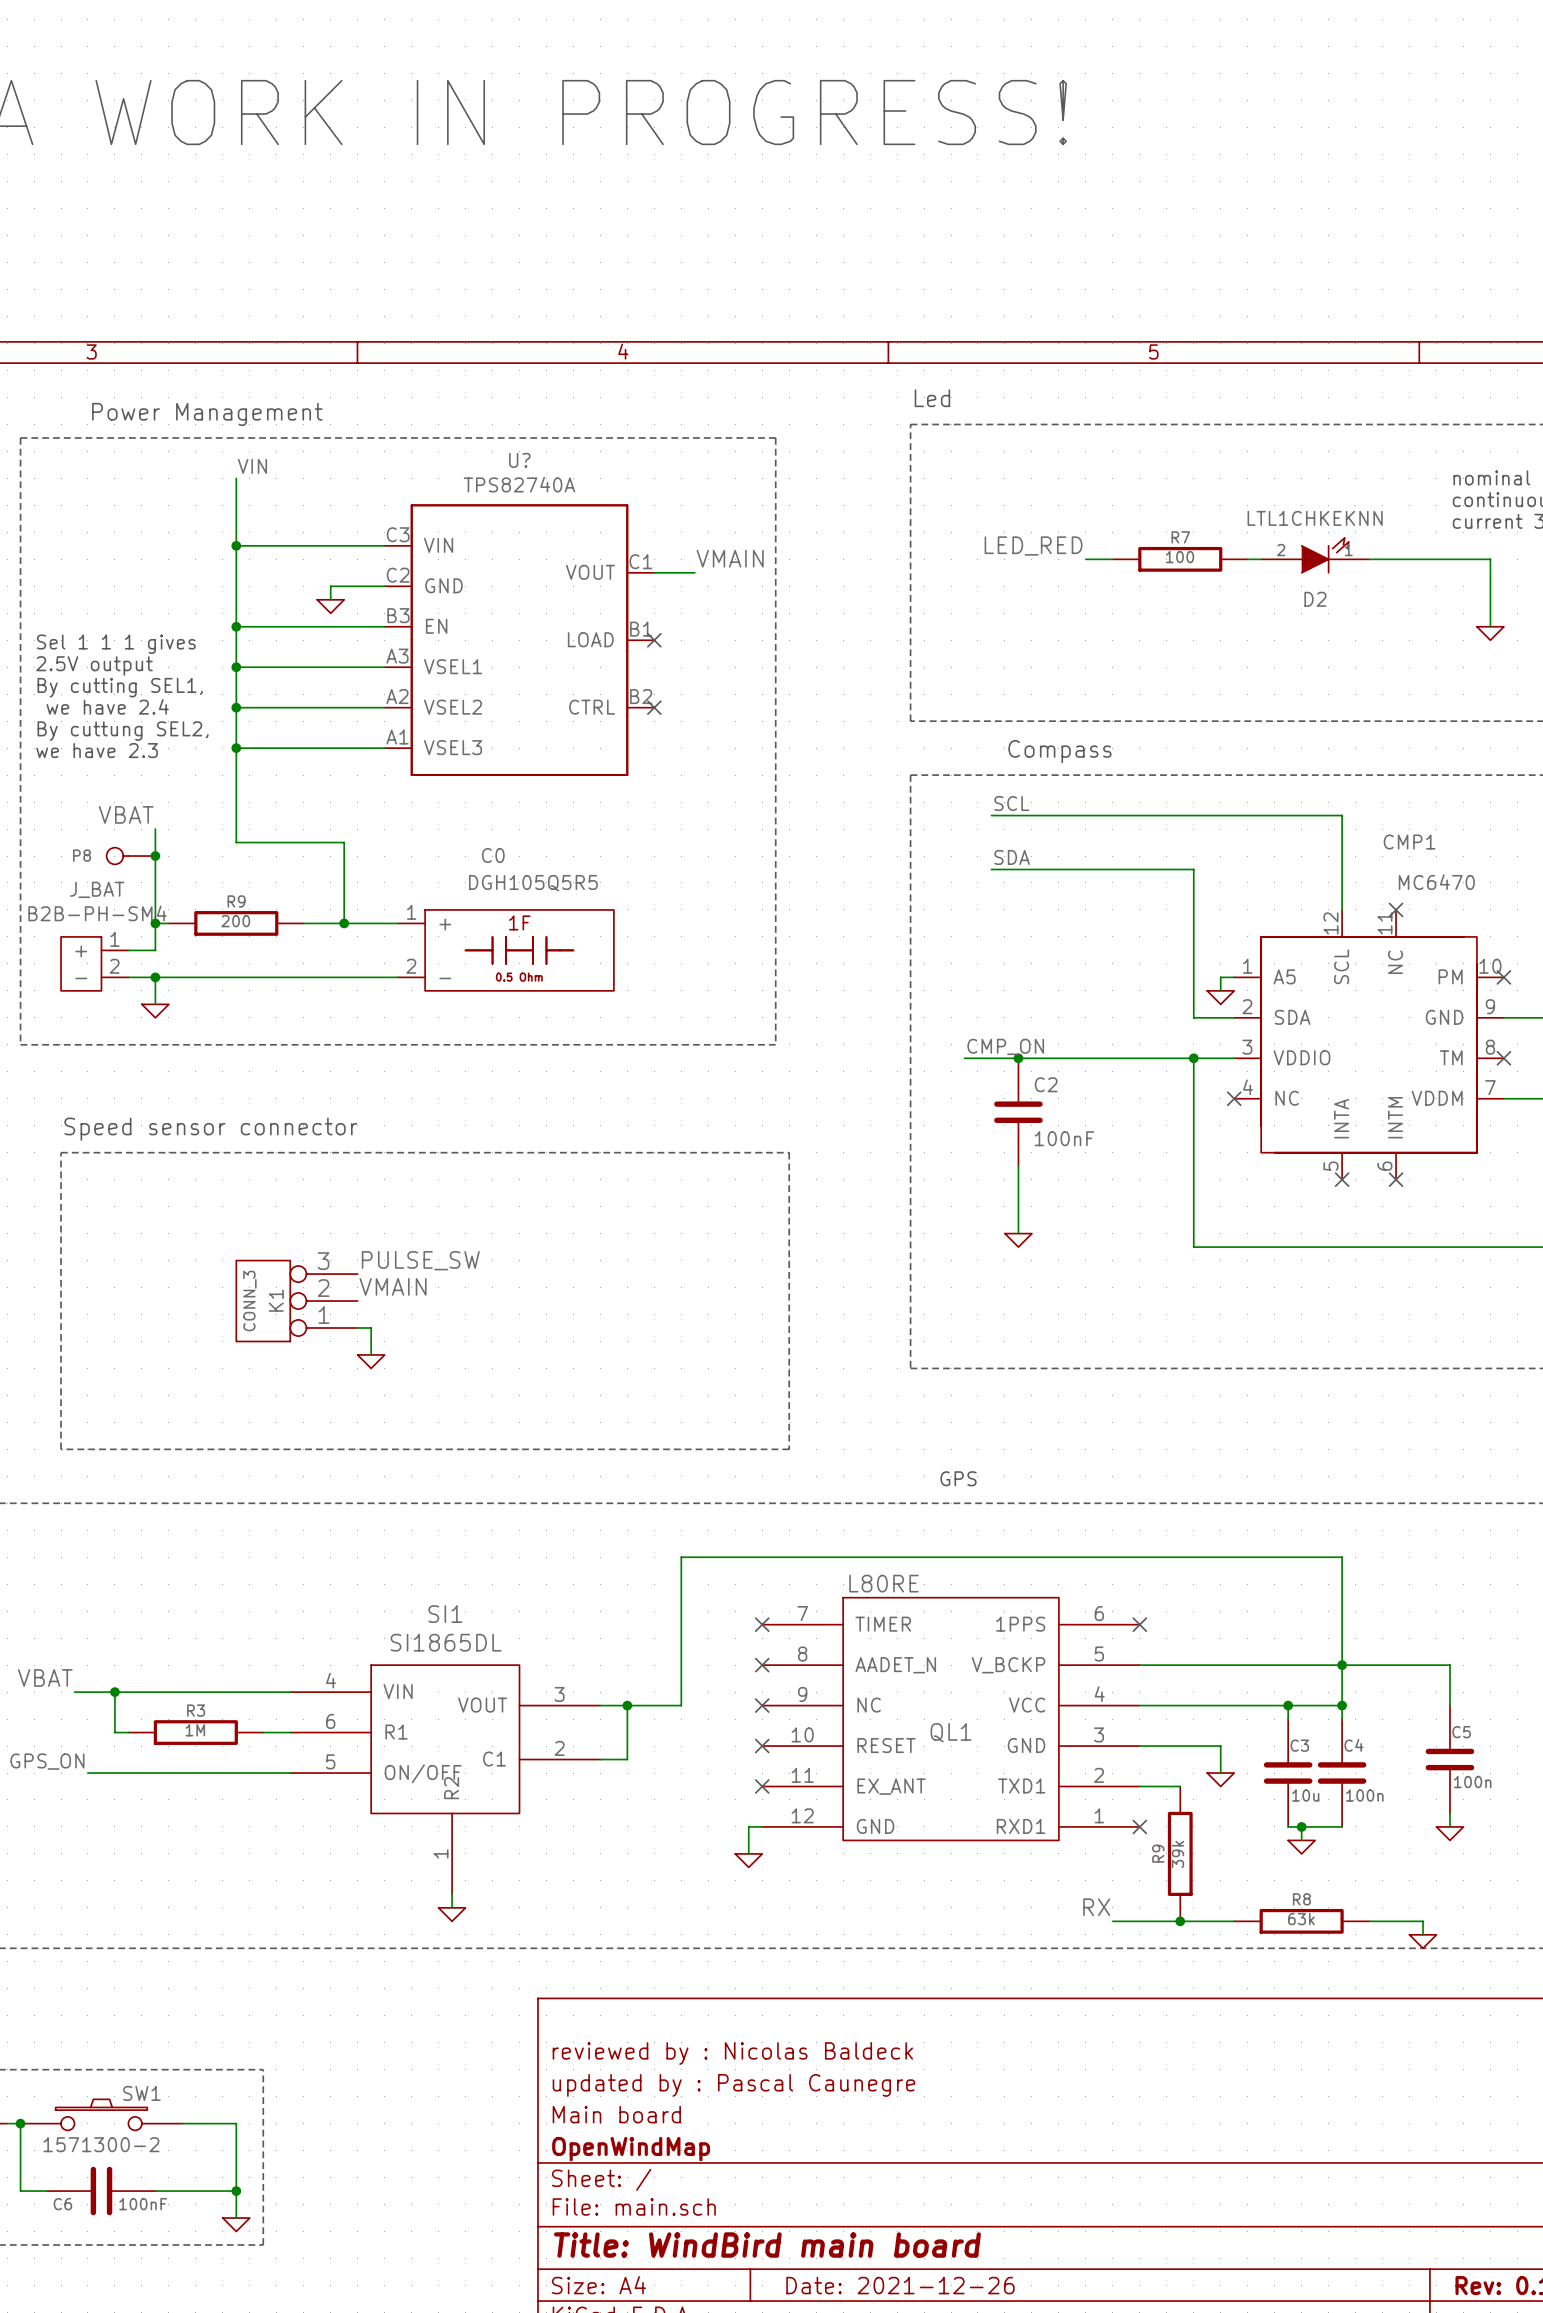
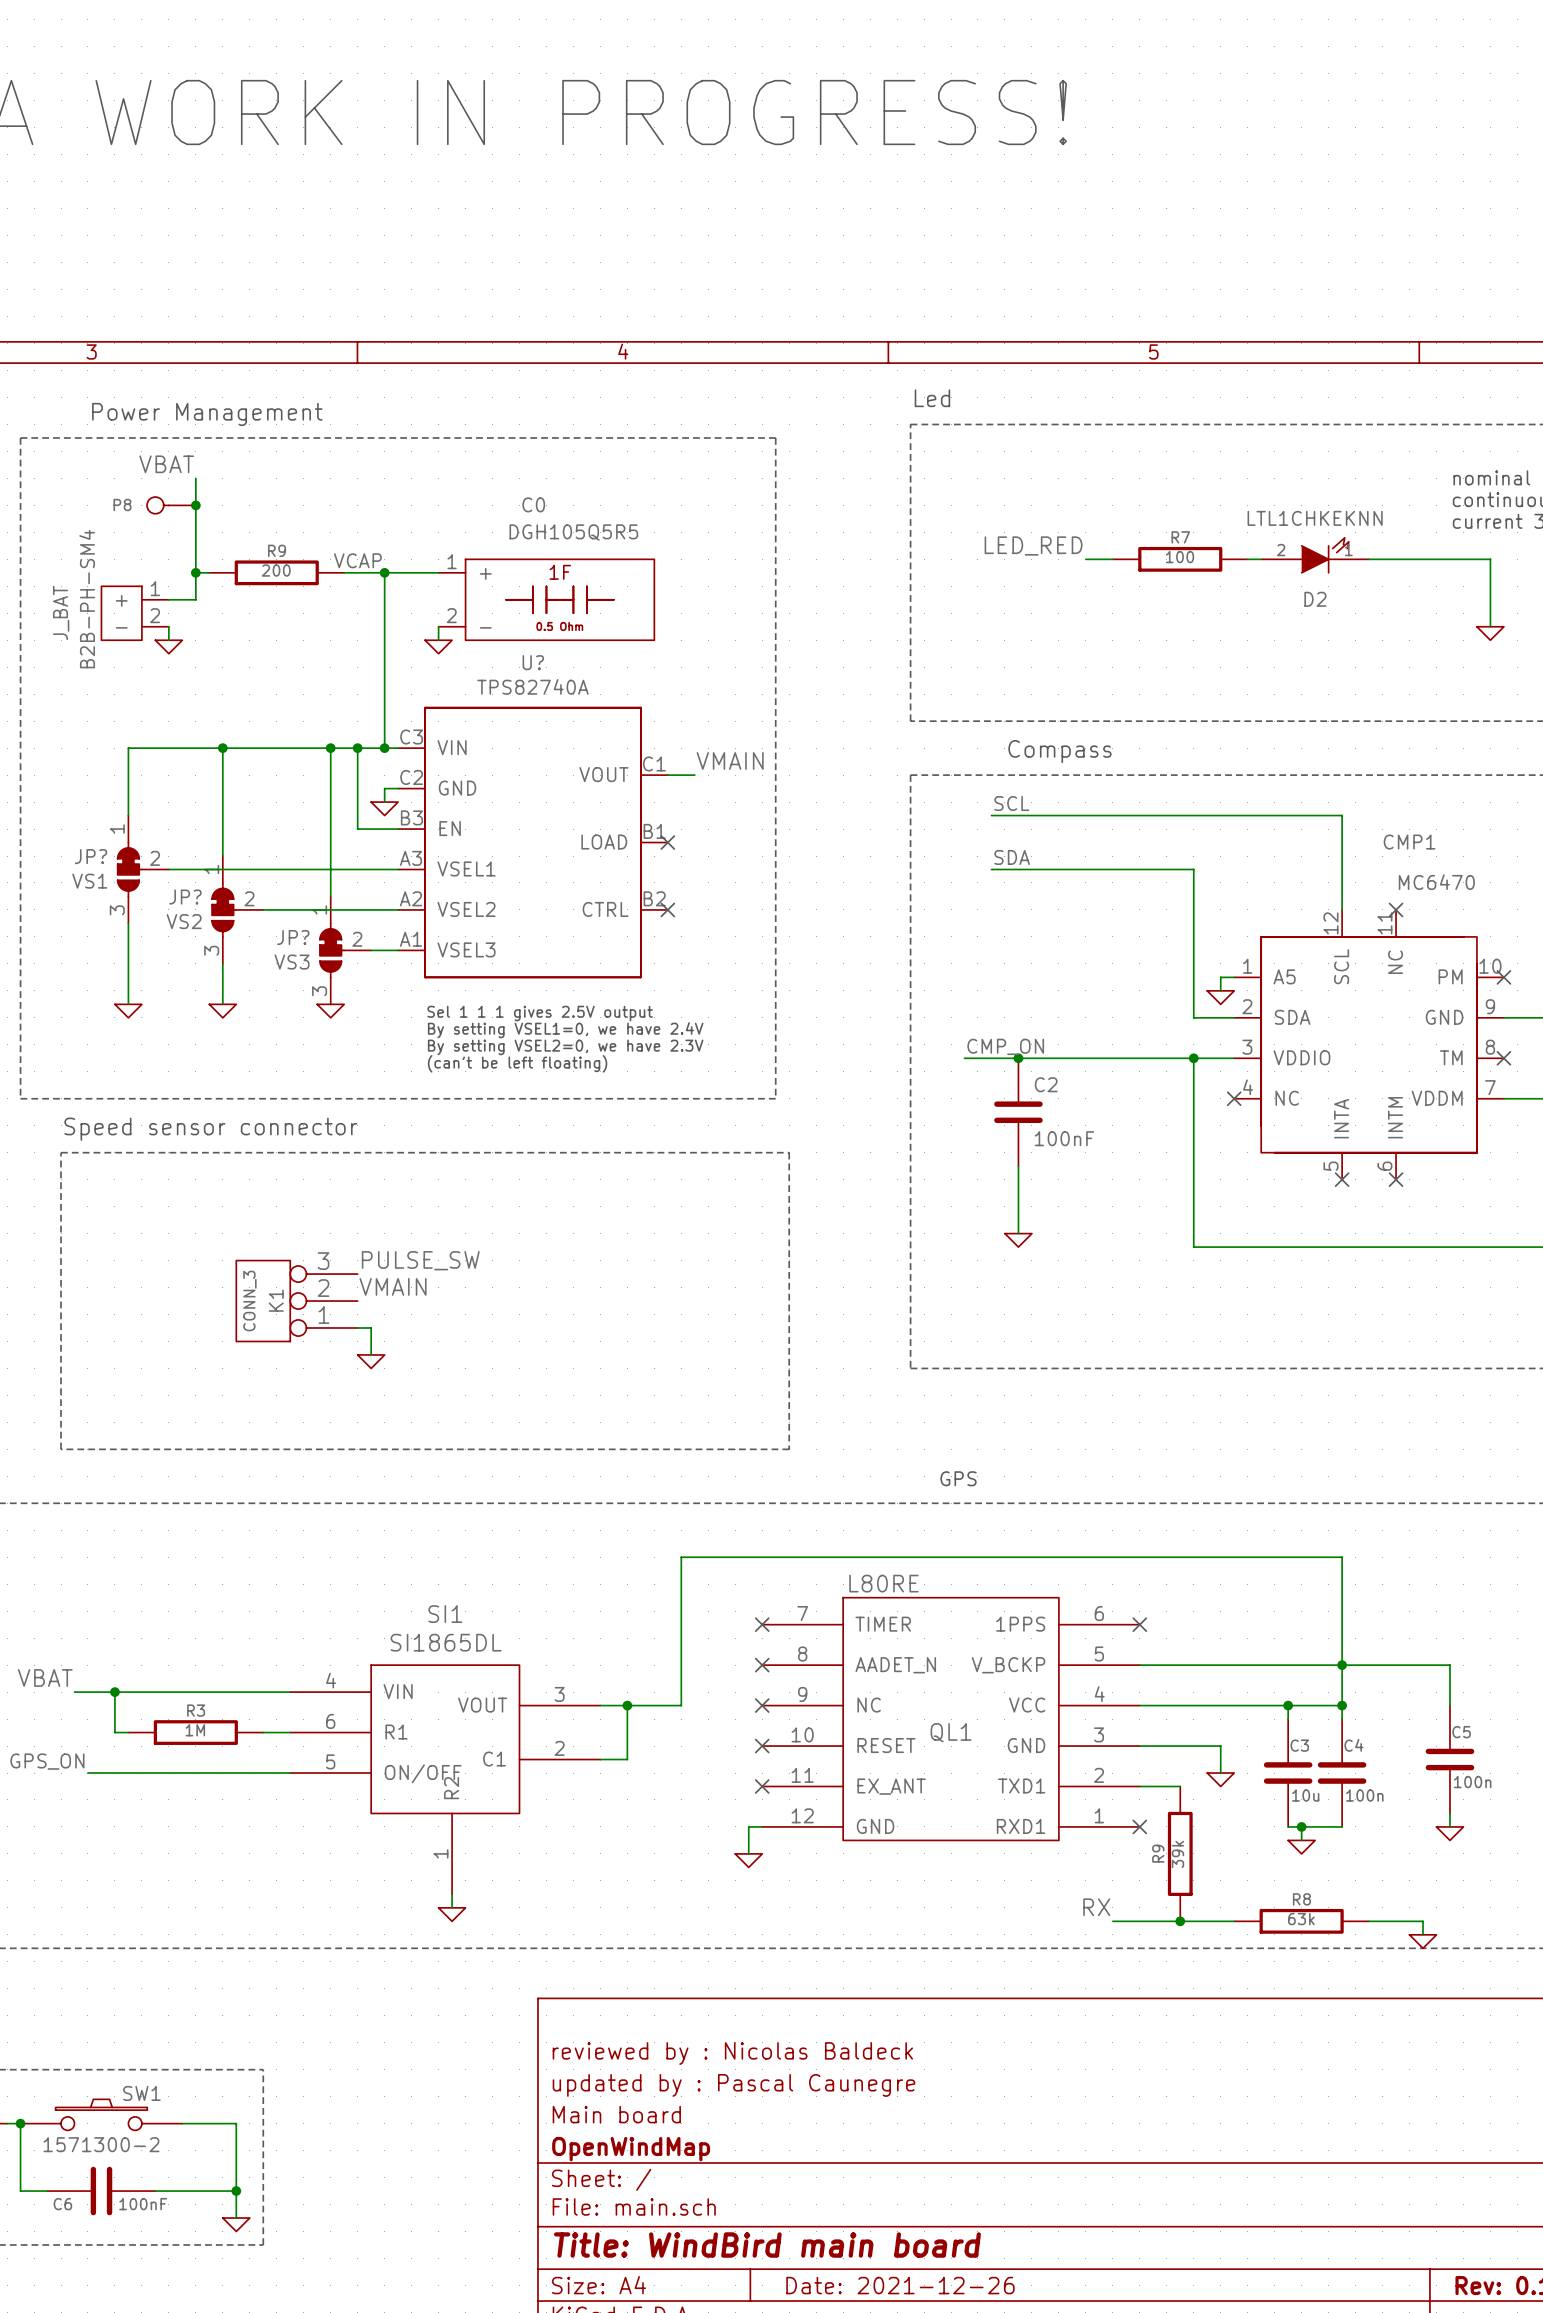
label: none -> VBAT (166, 464)
label: VIN (252, 466) -> none
wire: none -> (195, 478) (195, 599) (168, 599)
wire: (236, 478) (236, 842) (344, 842) (344, 923) -> none
junction: none -> (195, 505)
wire: (236, 545) (384, 545) -> none
junction: (236, 545) -> none
label position: VMAIN (730, 558) -> VMAIN (730, 760)
label: none -> VCAP (357, 560)
wire: none -> (195, 572) (209, 572)
junction: none -> (195, 572)
R9: none -> 200 (276, 572)
wire: none -> (344, 572) (438, 572)
wire: none -> (384, 572) (384, 748) (398, 748)
junction: none -> (384, 572)
wire: (654, 572) (694, 572) -> none
wire: (384, 586) (330, 586) (330, 599) -> none
power symbol: (330, 606) -> none
J_BAT: none -> B2B-PH-SM4 (135, 613)
wire: none -> (168, 626) (168, 640)
wire: (236, 626) (384, 626) -> none
junction: (236, 626) -> none
wire: none -> (438, 626) (438, 640)
U? position: (519, 640) -> (532, 842)
no-connect mark: (654, 640) -> none
text: Sel 1 1 1 gives (116, 644) -> none
power symbol: none -> (168, 646)
power symbol: none -> (438, 646)
text: 2.5V output (94, 665) -> none
wire: (236, 667) (384, 667) -> none
junction: (236, 667) -> none
text: By cutting SEL1, (120, 687) -> none
text: we have 2.4 (107, 706) -> none
wire: (236, 707) (384, 707) -> none
junction: (236, 707) -> none
no-connect mark: (654, 707) -> none
text: By cuttung SEL2, (123, 731) -> none
wire: none -> (222, 748) (222, 856)
wire: none -> (236, 748) (128, 748) (128, 815)
junction position: (236, 748) -> (222, 748)
wire: none -> (330, 748) (330, 896)
junction: none -> (330, 748)
wire: none -> (357, 748) (357, 829) (398, 829)
junction: none -> (357, 748)
junction: none -> (384, 748)
text: we have 2.3 (97, 750) -> none
wire: none -> (667, 775) (694, 775)
wire: none -> (398, 788) (384, 788) (384, 802)
power symbol: none -> (384, 808)
label: VBAT (126, 814) -> none
wire: (155, 829) (155, 950) (128, 950) -> none
no-connect mark: none -> (667, 842)
P8 position: (130, 856) -> (171, 505)
junction: (155, 856) -> none
JP?: none -> VS1 (143, 869)
wire: none -> (168, 869) (398, 869)
JP?: none -> VS2 (237, 909)
wire: none -> (263, 909) (398, 909)
no-connect mark: none -> (667, 909)
wire: none -> (128, 923) (128, 1004)
wire: (155, 923) (168, 923) -> none
junction: (155, 923) -> none
R9: 200 (236, 923) -> none
wire: (303, 923) (398, 923) -> none
junction: (344, 923) -> none
JP?: none -> VS3 (345, 950)
wire: none -> (371, 950) (398, 950)
C0 position: (506, 950) -> (546, 599)
J_BAT: B2B-PH-SM4 (94, 963) -> none
wire: none -> (222, 963) (222, 1004)
wire: (128, 977) (398, 977) -> none
wire: (155, 977) (155, 1004) -> none
junction: (155, 977) -> none
power symbol position: (155, 1011) -> (128, 1011)
power symbol: none -> (222, 1011)
power symbol: none -> (330, 1011)
text: none -> Sel 1 1 1 gives 2.5V output (540, 1013)
text: none -> By setting VSEL1=0, we have 2.4V (565, 1030)
line: (20, 1044) (775, 1044) -> (20, 1044) (20, 1098) (775, 1098) (775, 1044)
text: none -> By setting VSEL2=0, we have 2.3V (565, 1047)
text: none -> (can't be left floating) (517, 1063)

